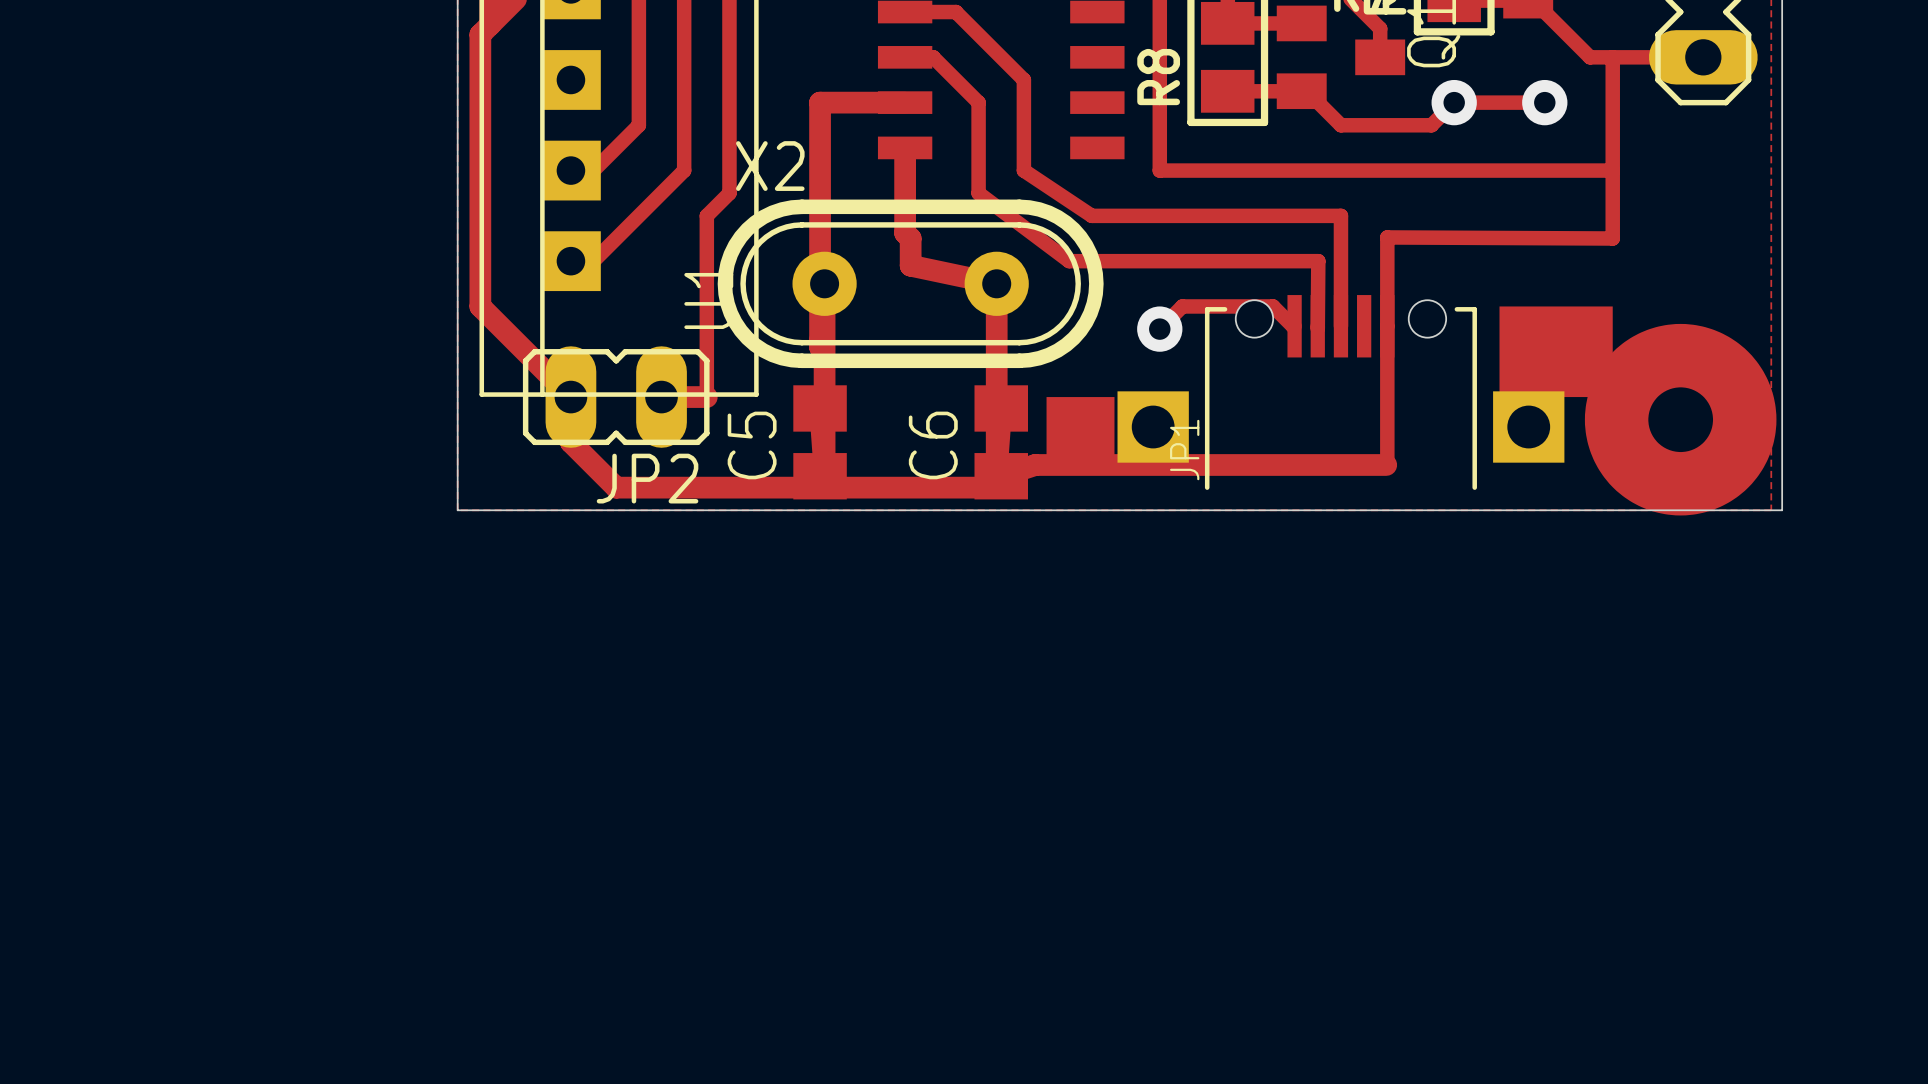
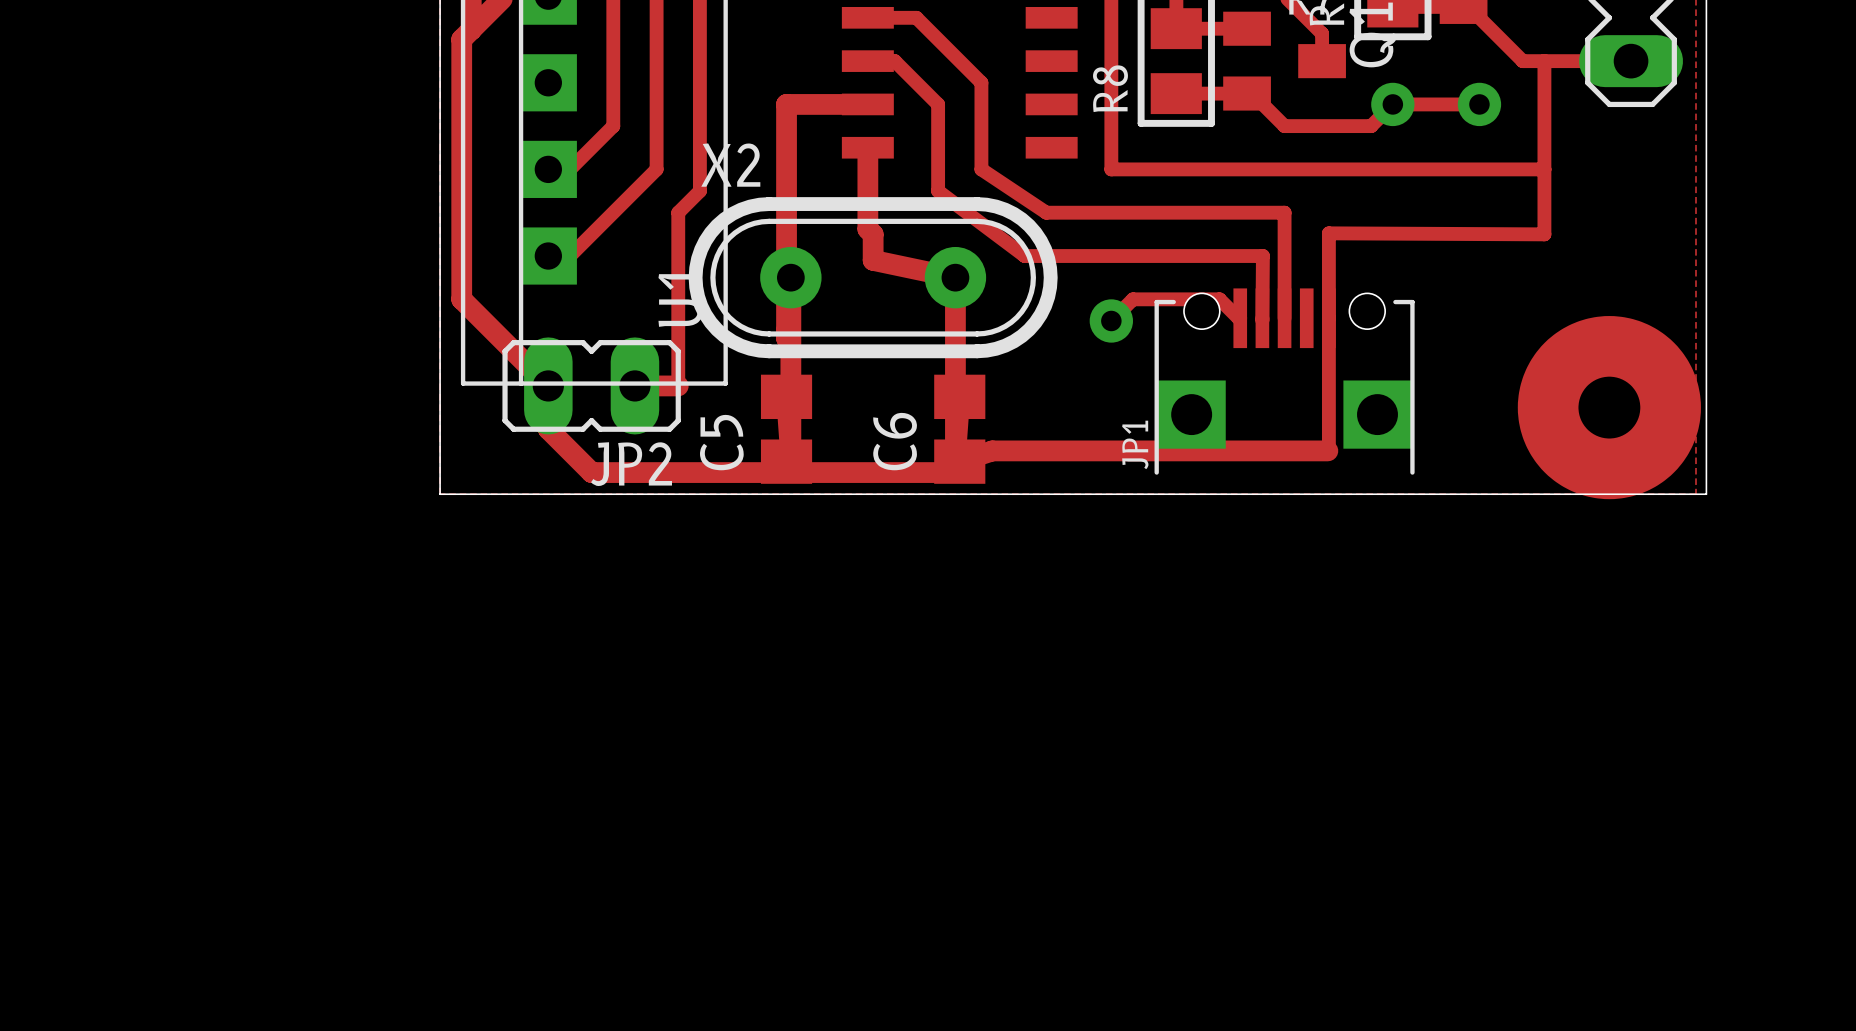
JP1 footprint: [1117, 295, 1565, 490] -> [1154, 288, 1415, 475]
drawing: [1499, 306, 1613, 398] -> none
drawing: [1046, 397, 1115, 465] -> none

